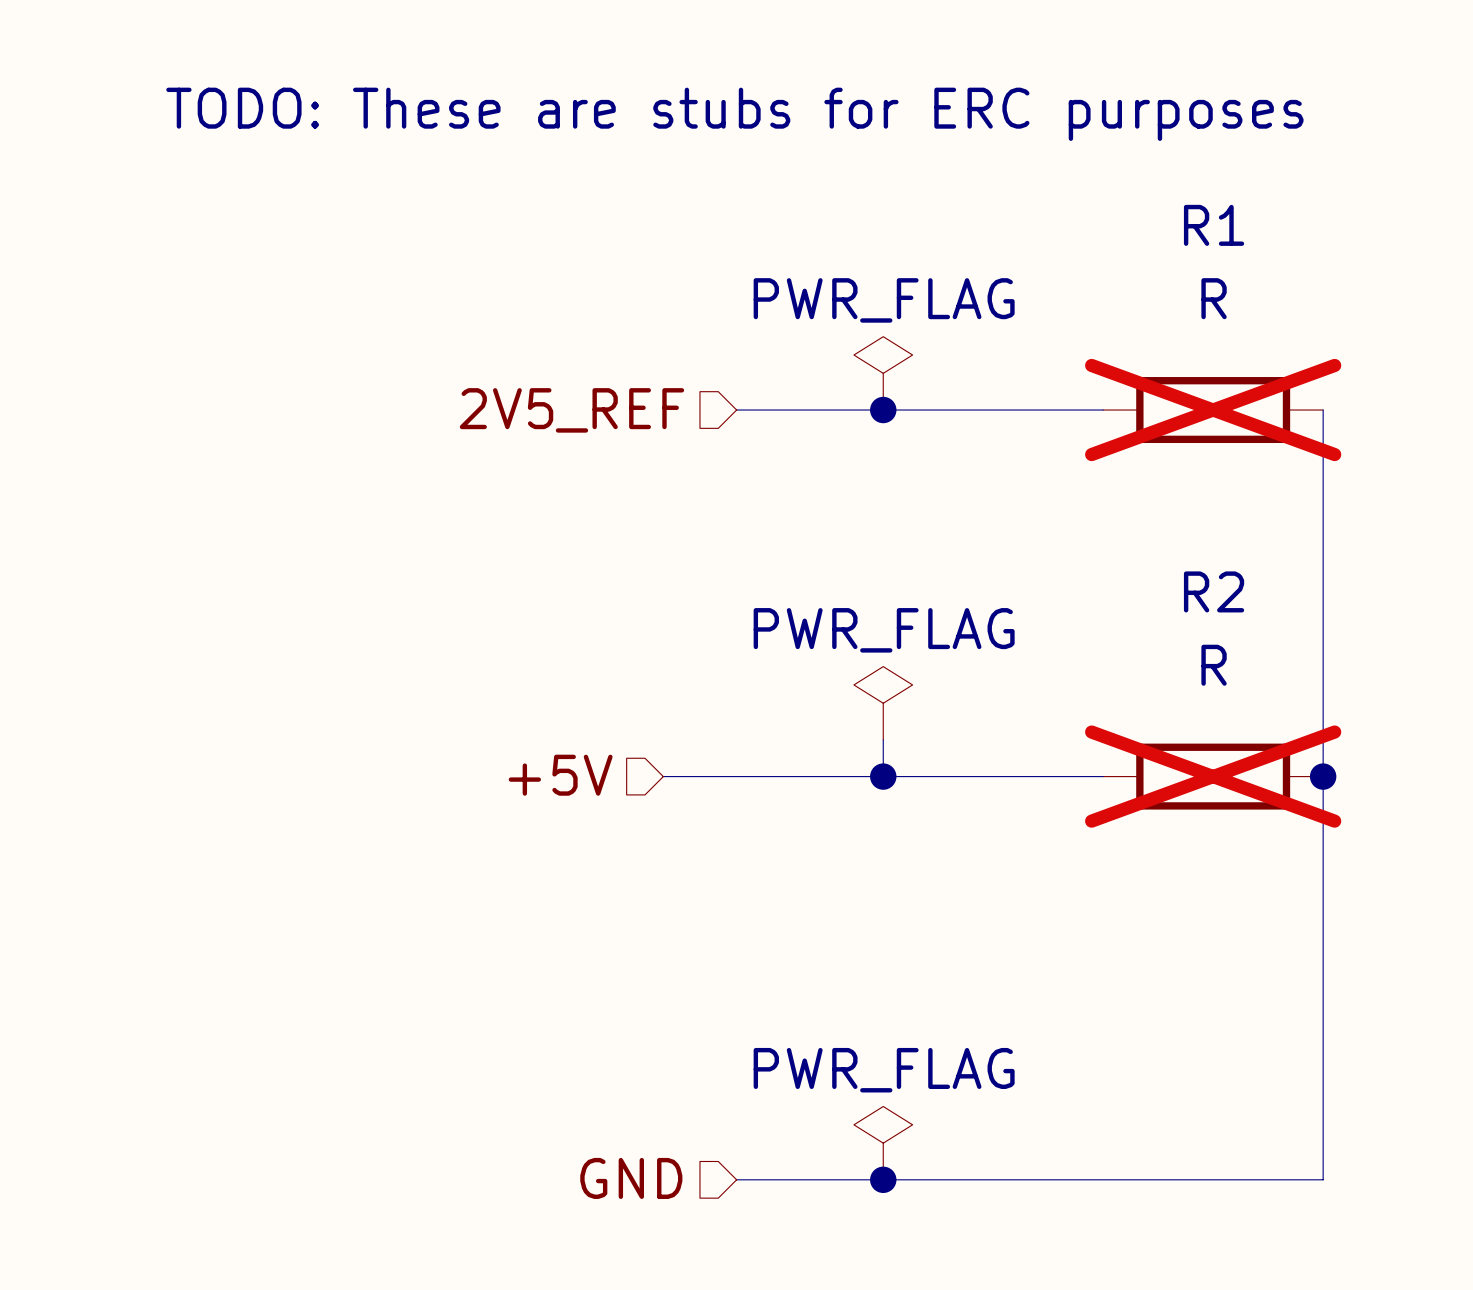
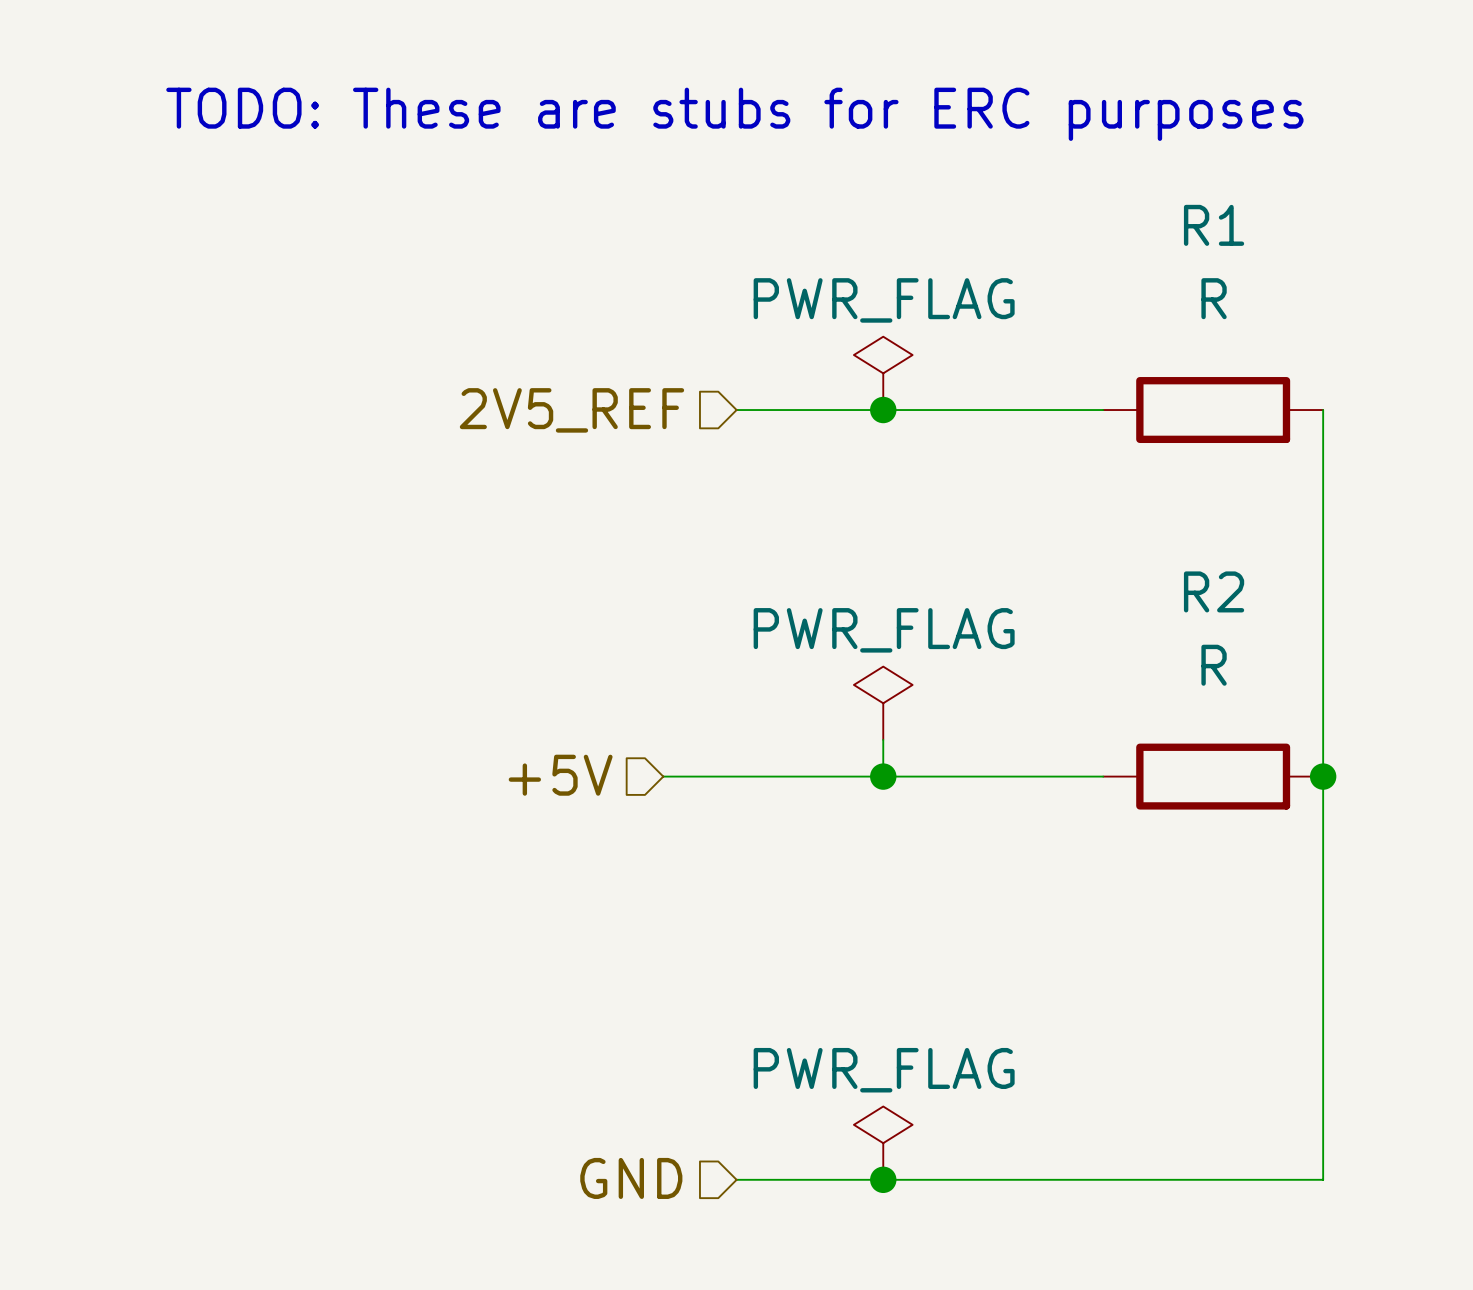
R1 do-not-place cross: (1213, 410) -> none
R2 do-not-place cross: (1213, 776) -> none

